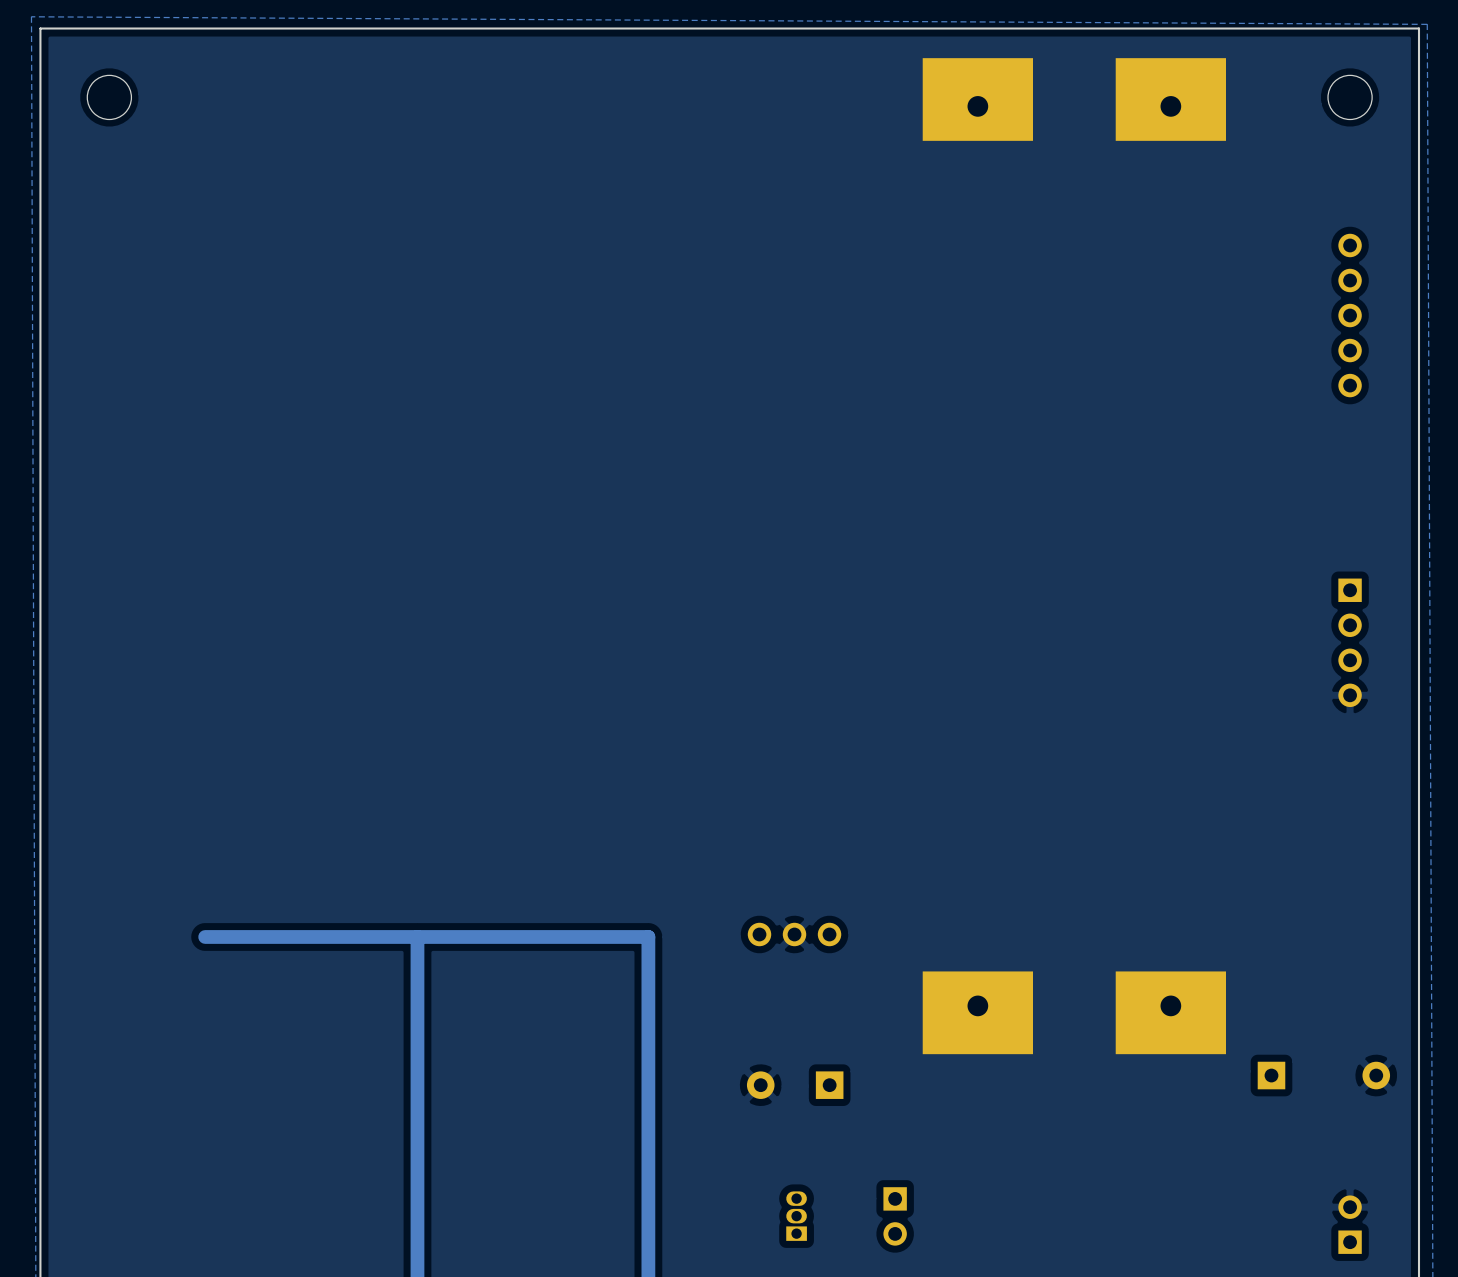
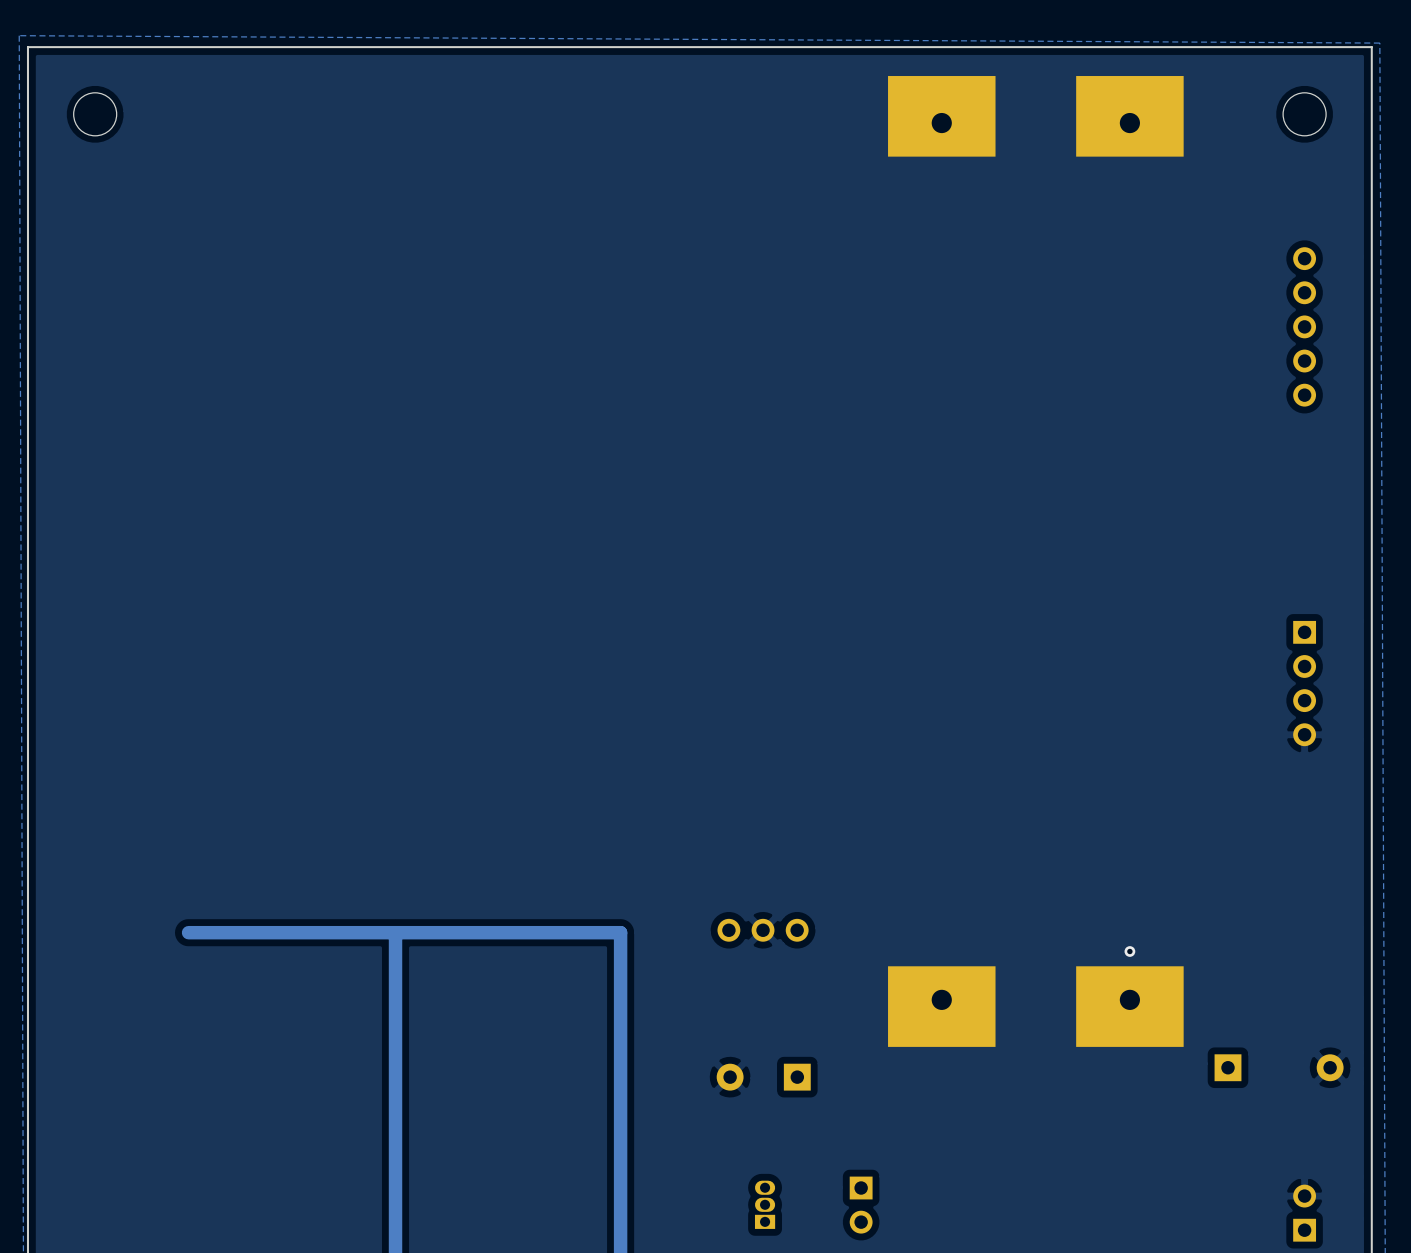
part position: (1350, 642) -> (1304, 683)
via: none -> (1129, 951)

